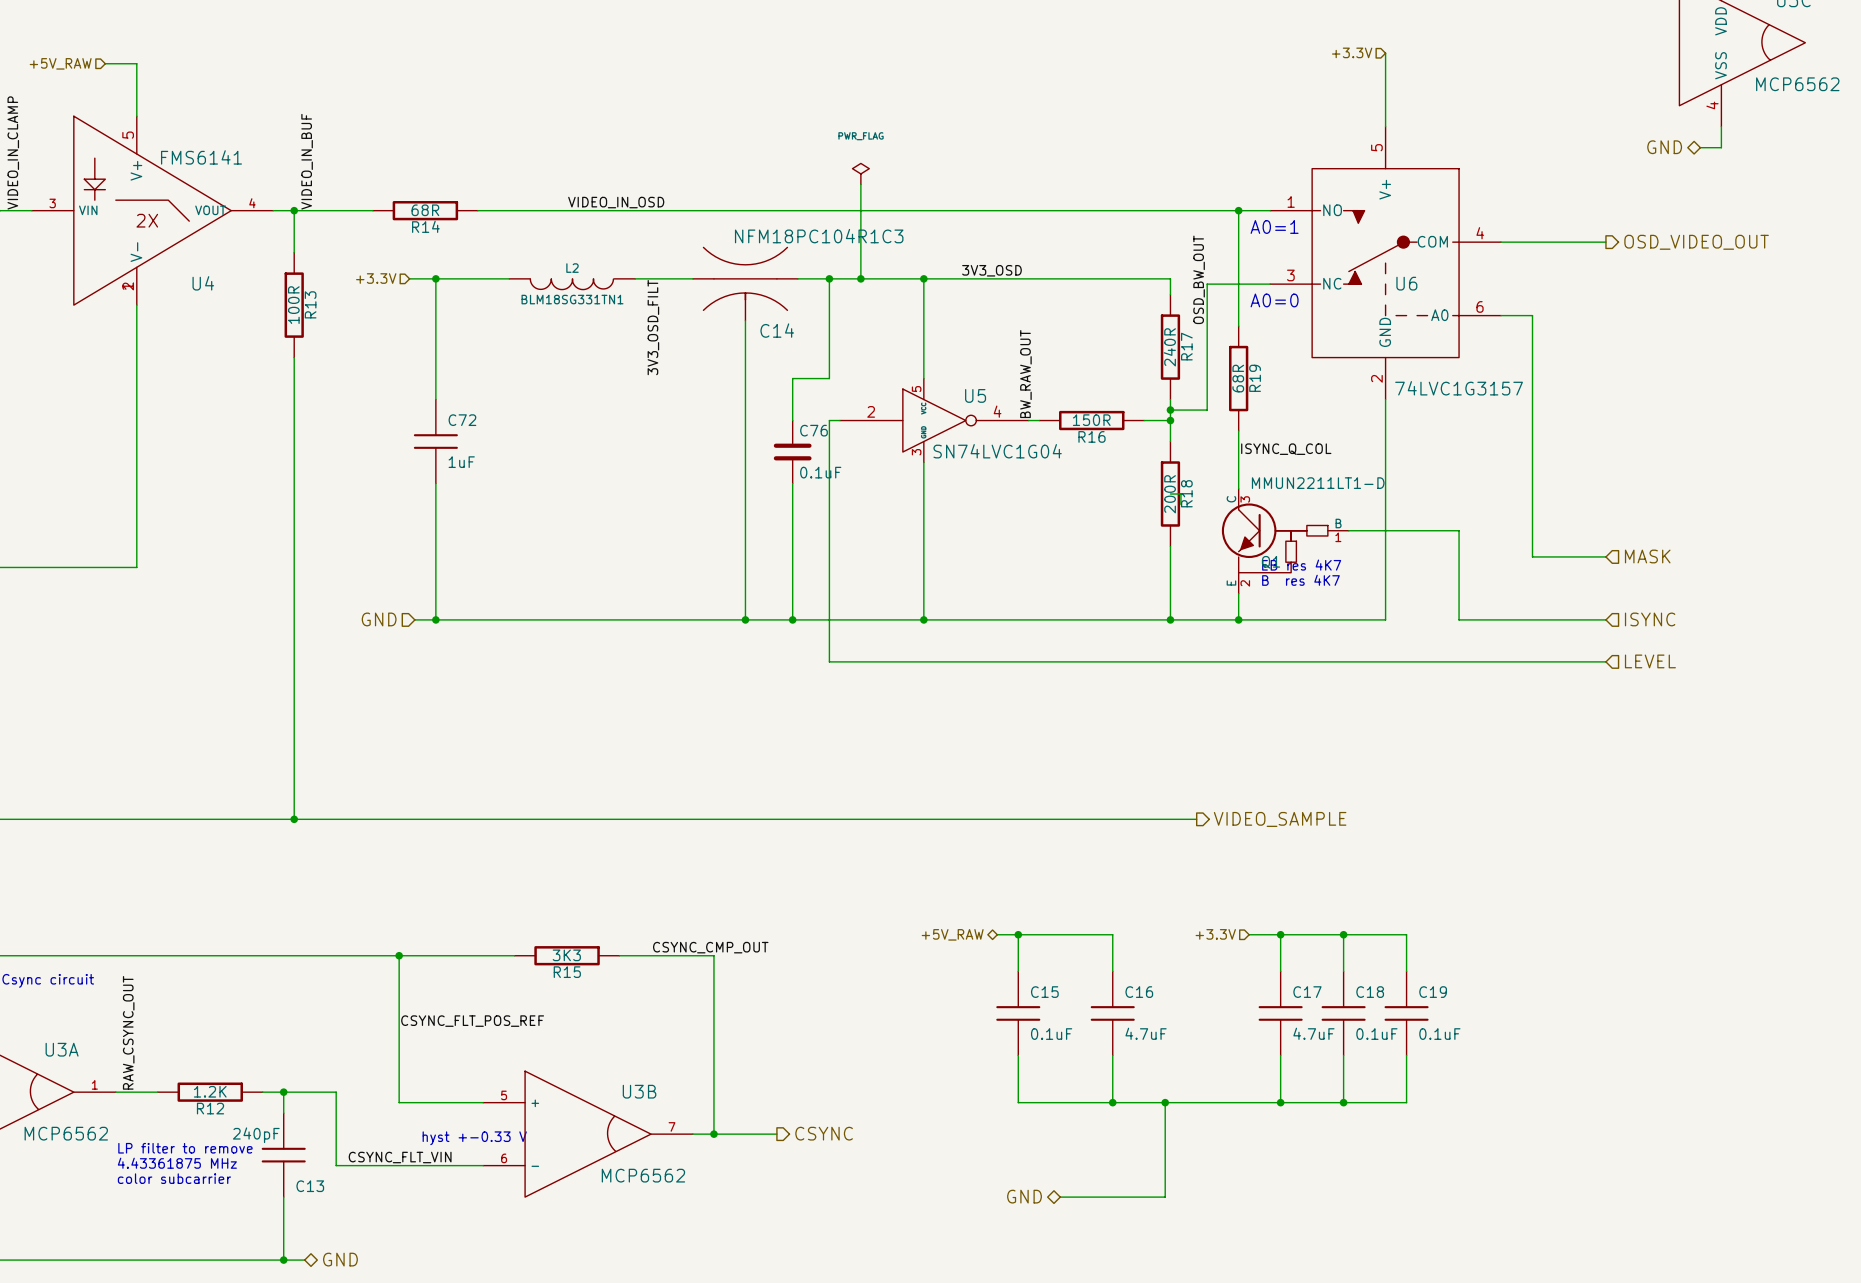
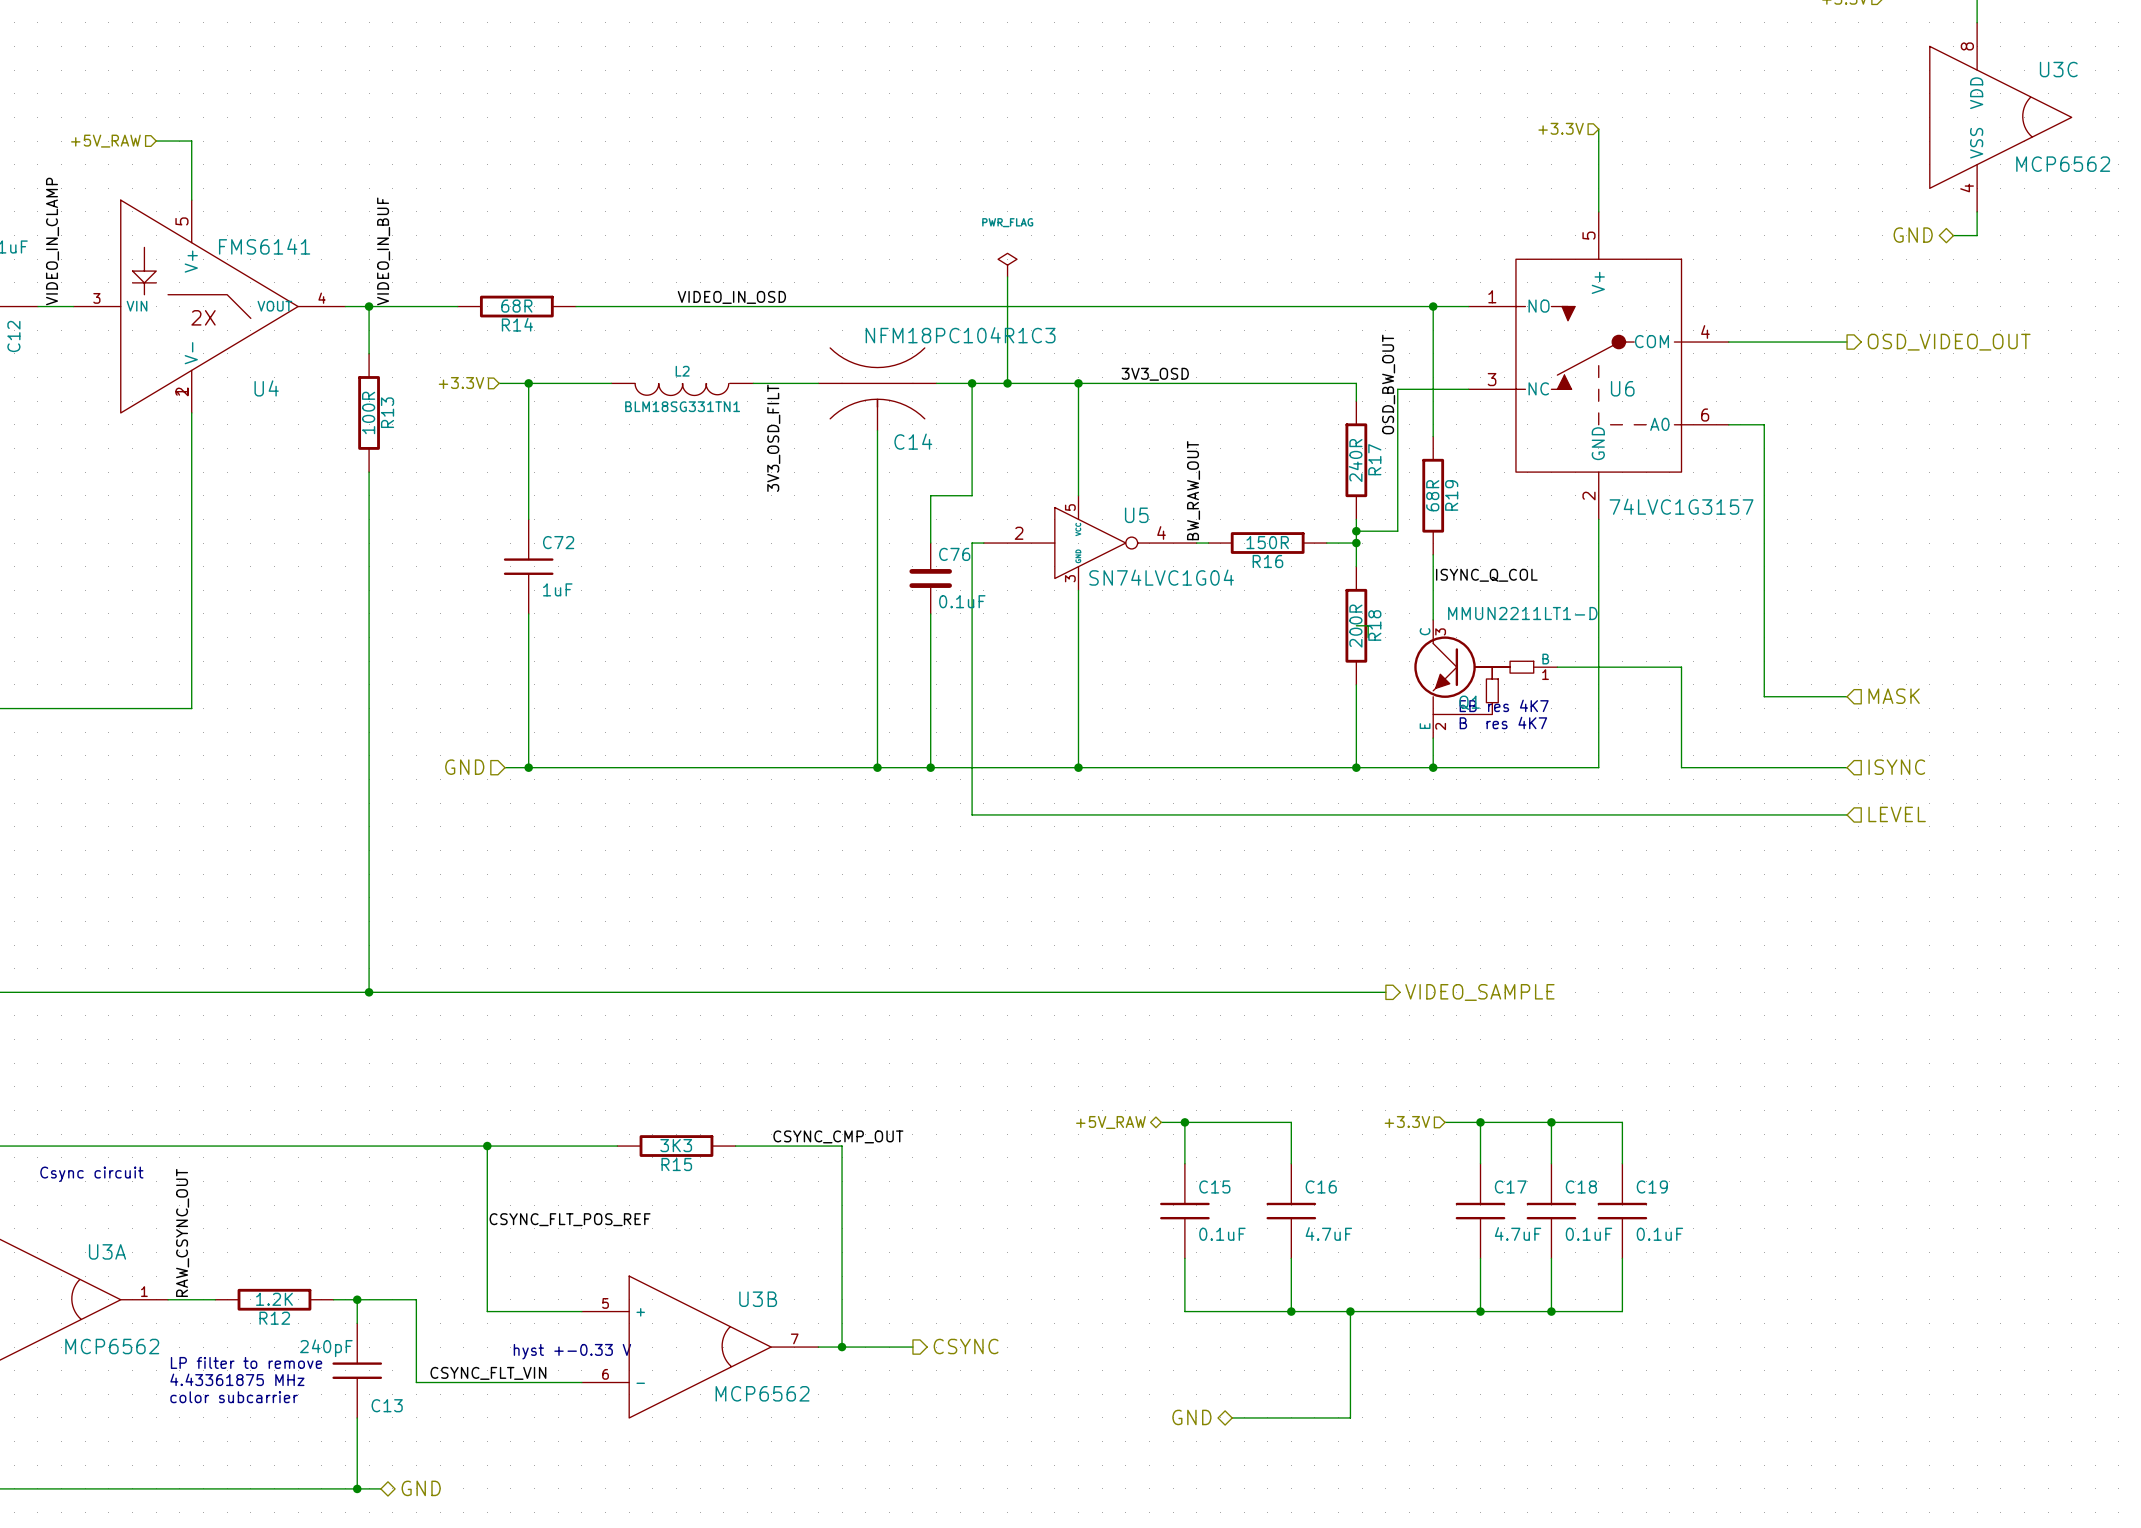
text: A0=1 (1274, 226) -> none
text: A0=0 (1274, 300) -> none

